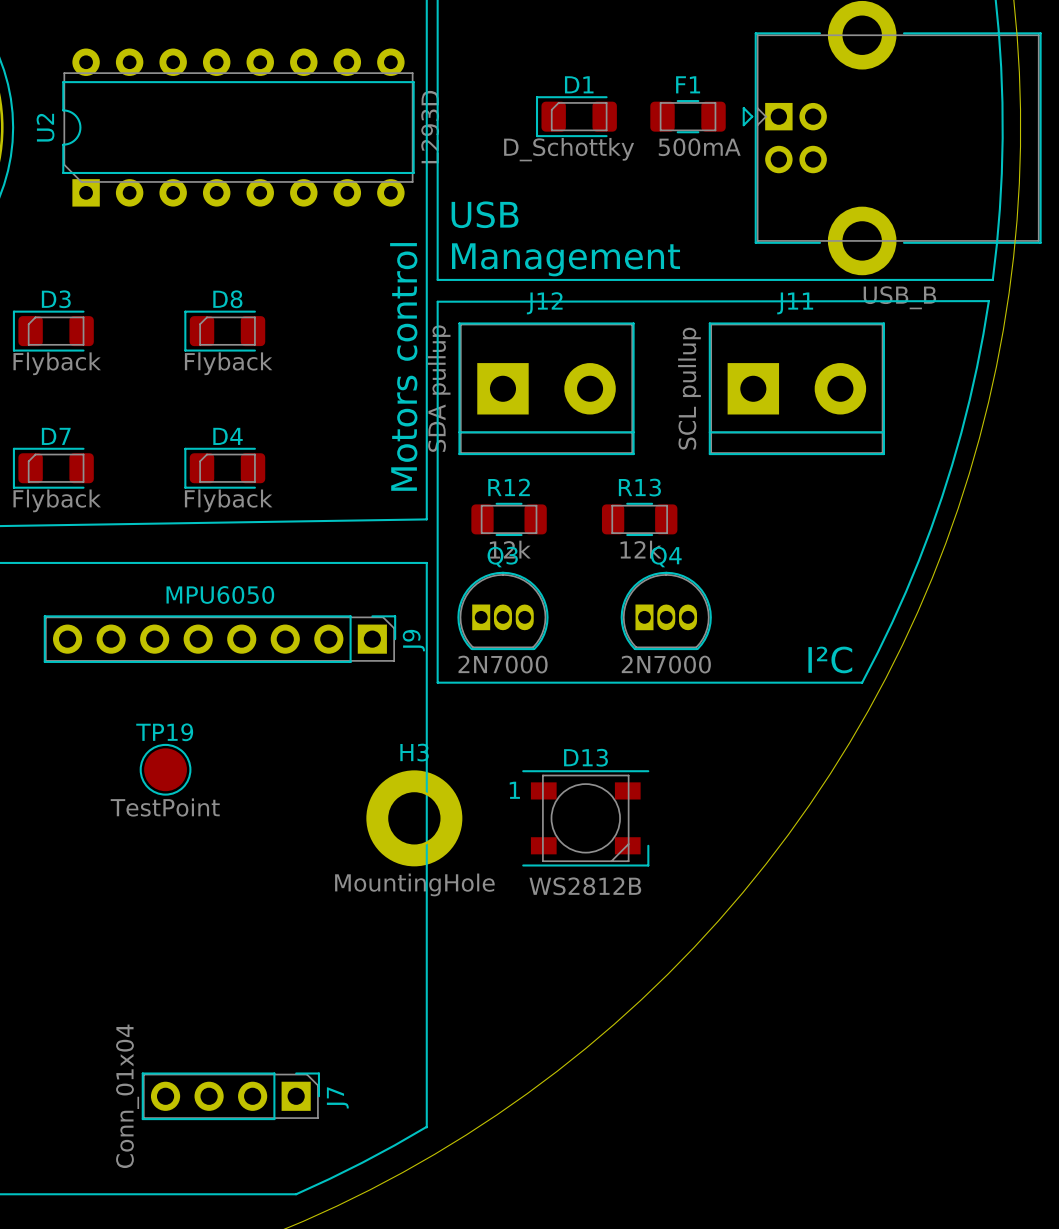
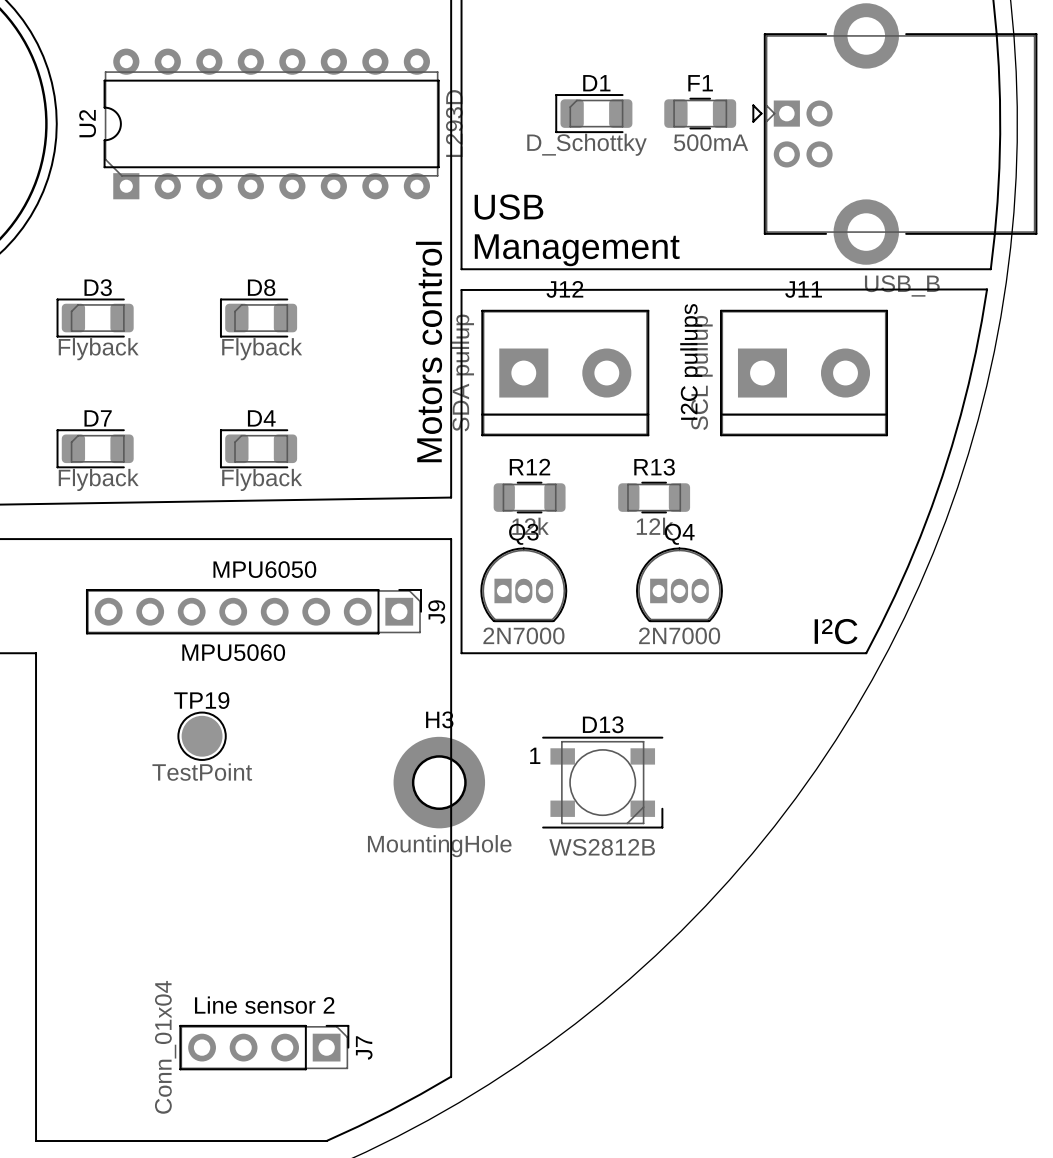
text: none -> I2C pullups (691, 361)
J9 value: MPU6050 (220, 594) -> MPU5060 (233, 652)
text: none -> MPU6050 (264, 569)
text: none -> Line sensor 2 (264, 1005)

